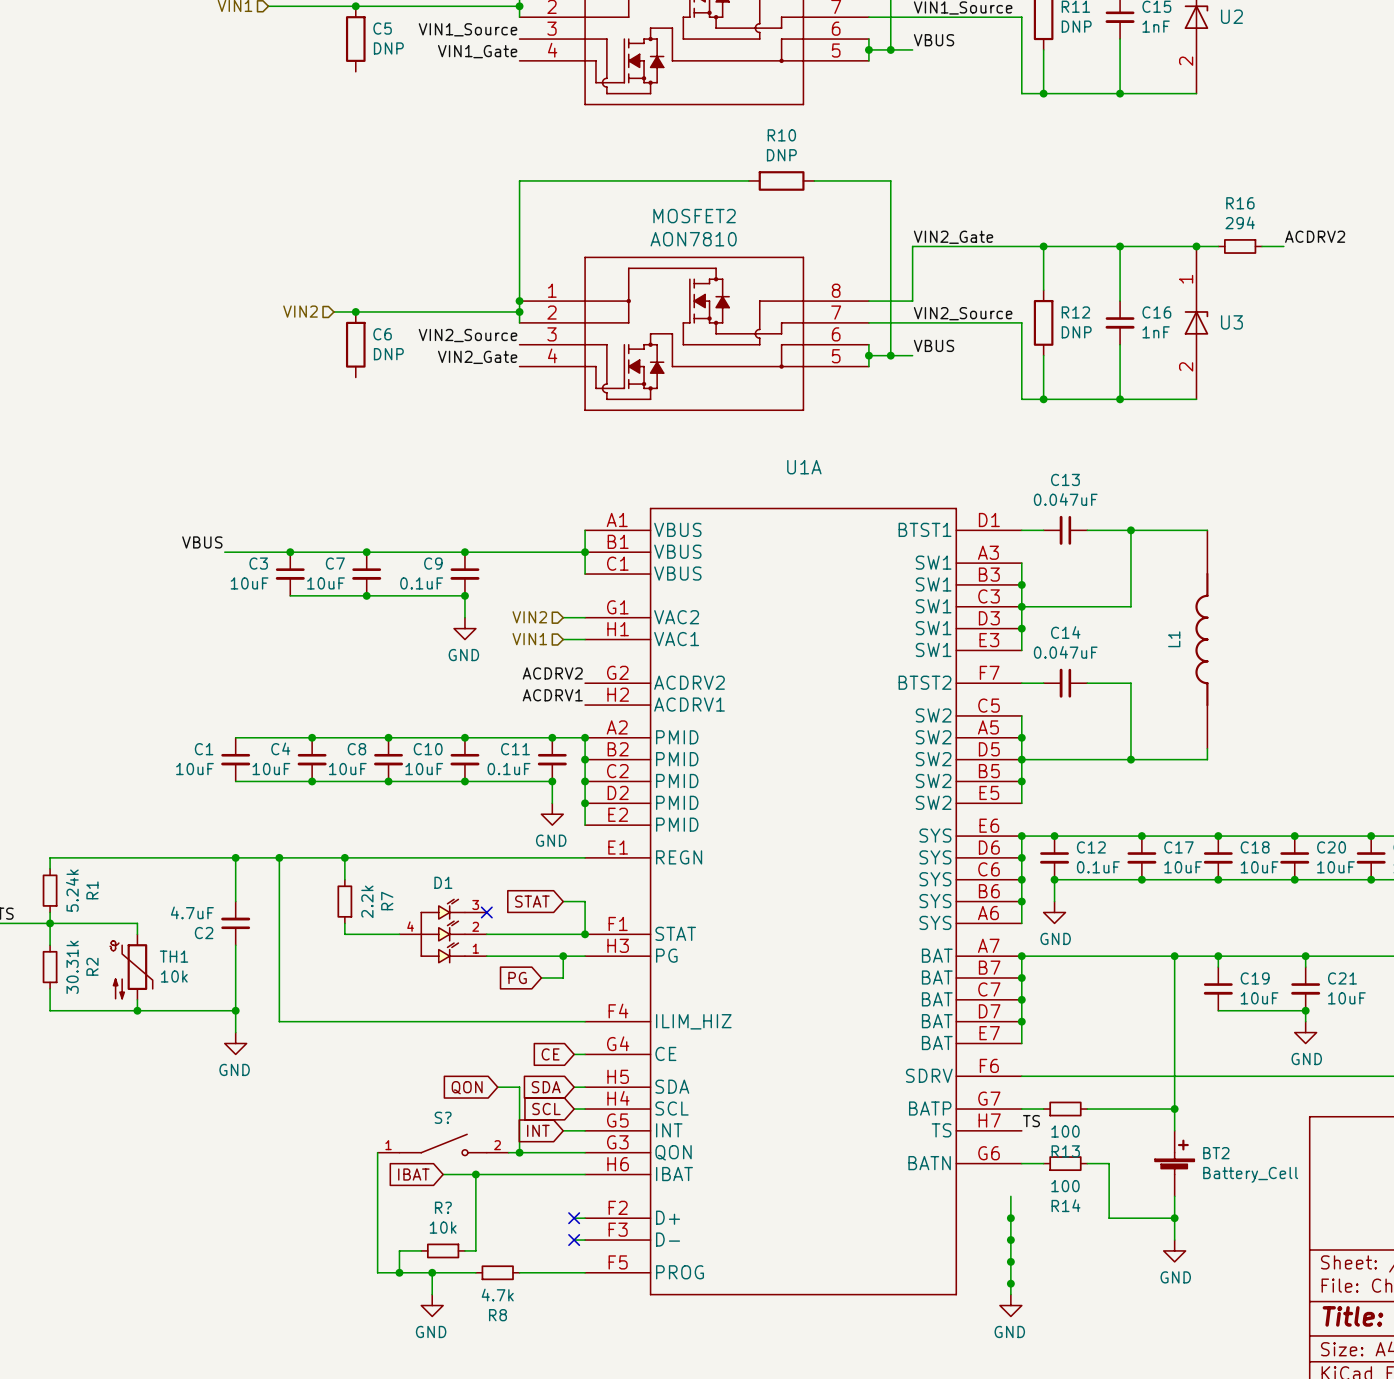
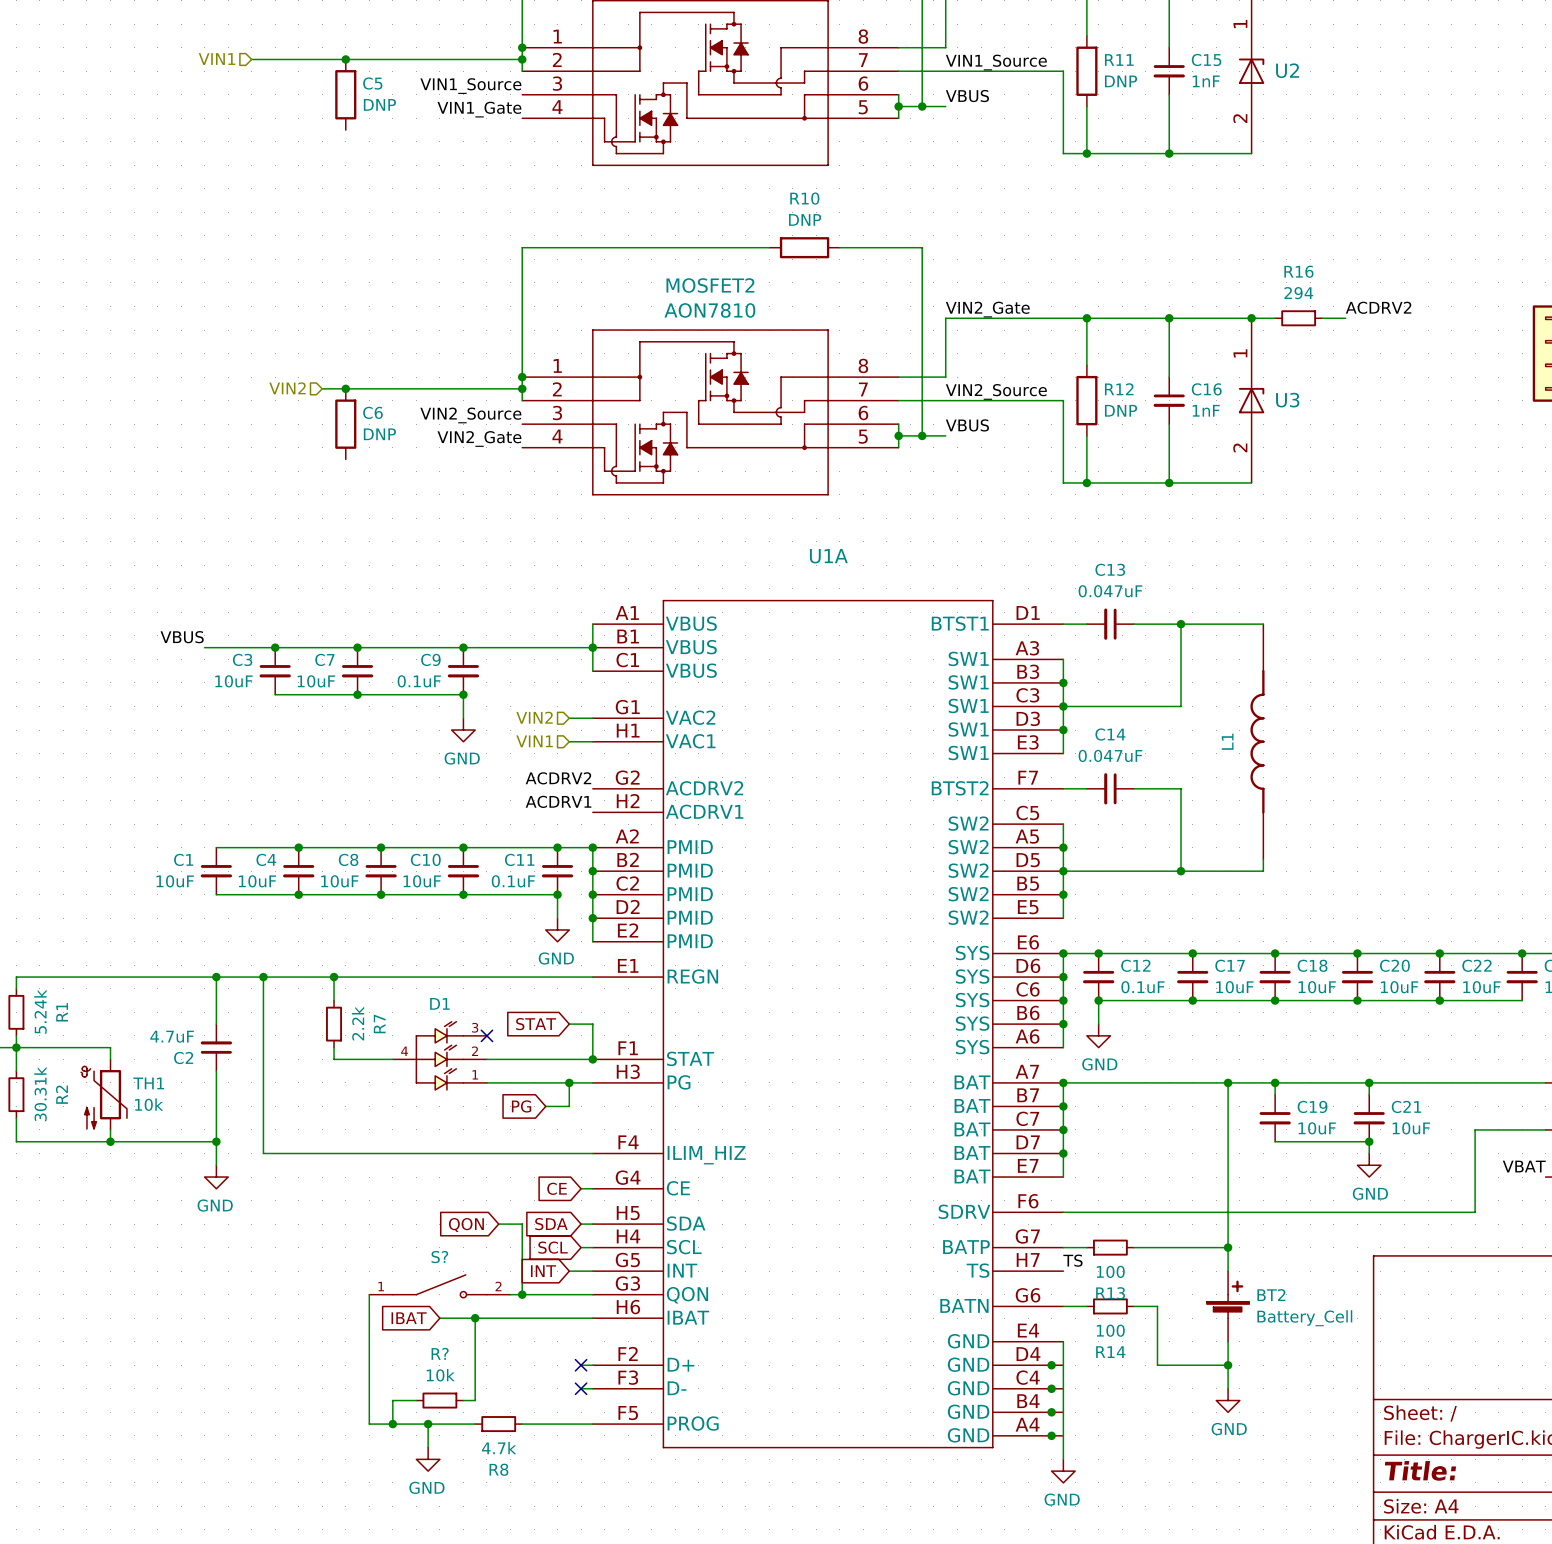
U1A symbol: [585, 507, 1022, 1296] -> [592, 600, 1064, 1449]
wire: (1010, 1196) (1010, 1294) -> none
wire: none -> (1063, 1341) (1063, 1459)
power symbol position: GND (1010, 1305) -> GND (1063, 1471)

